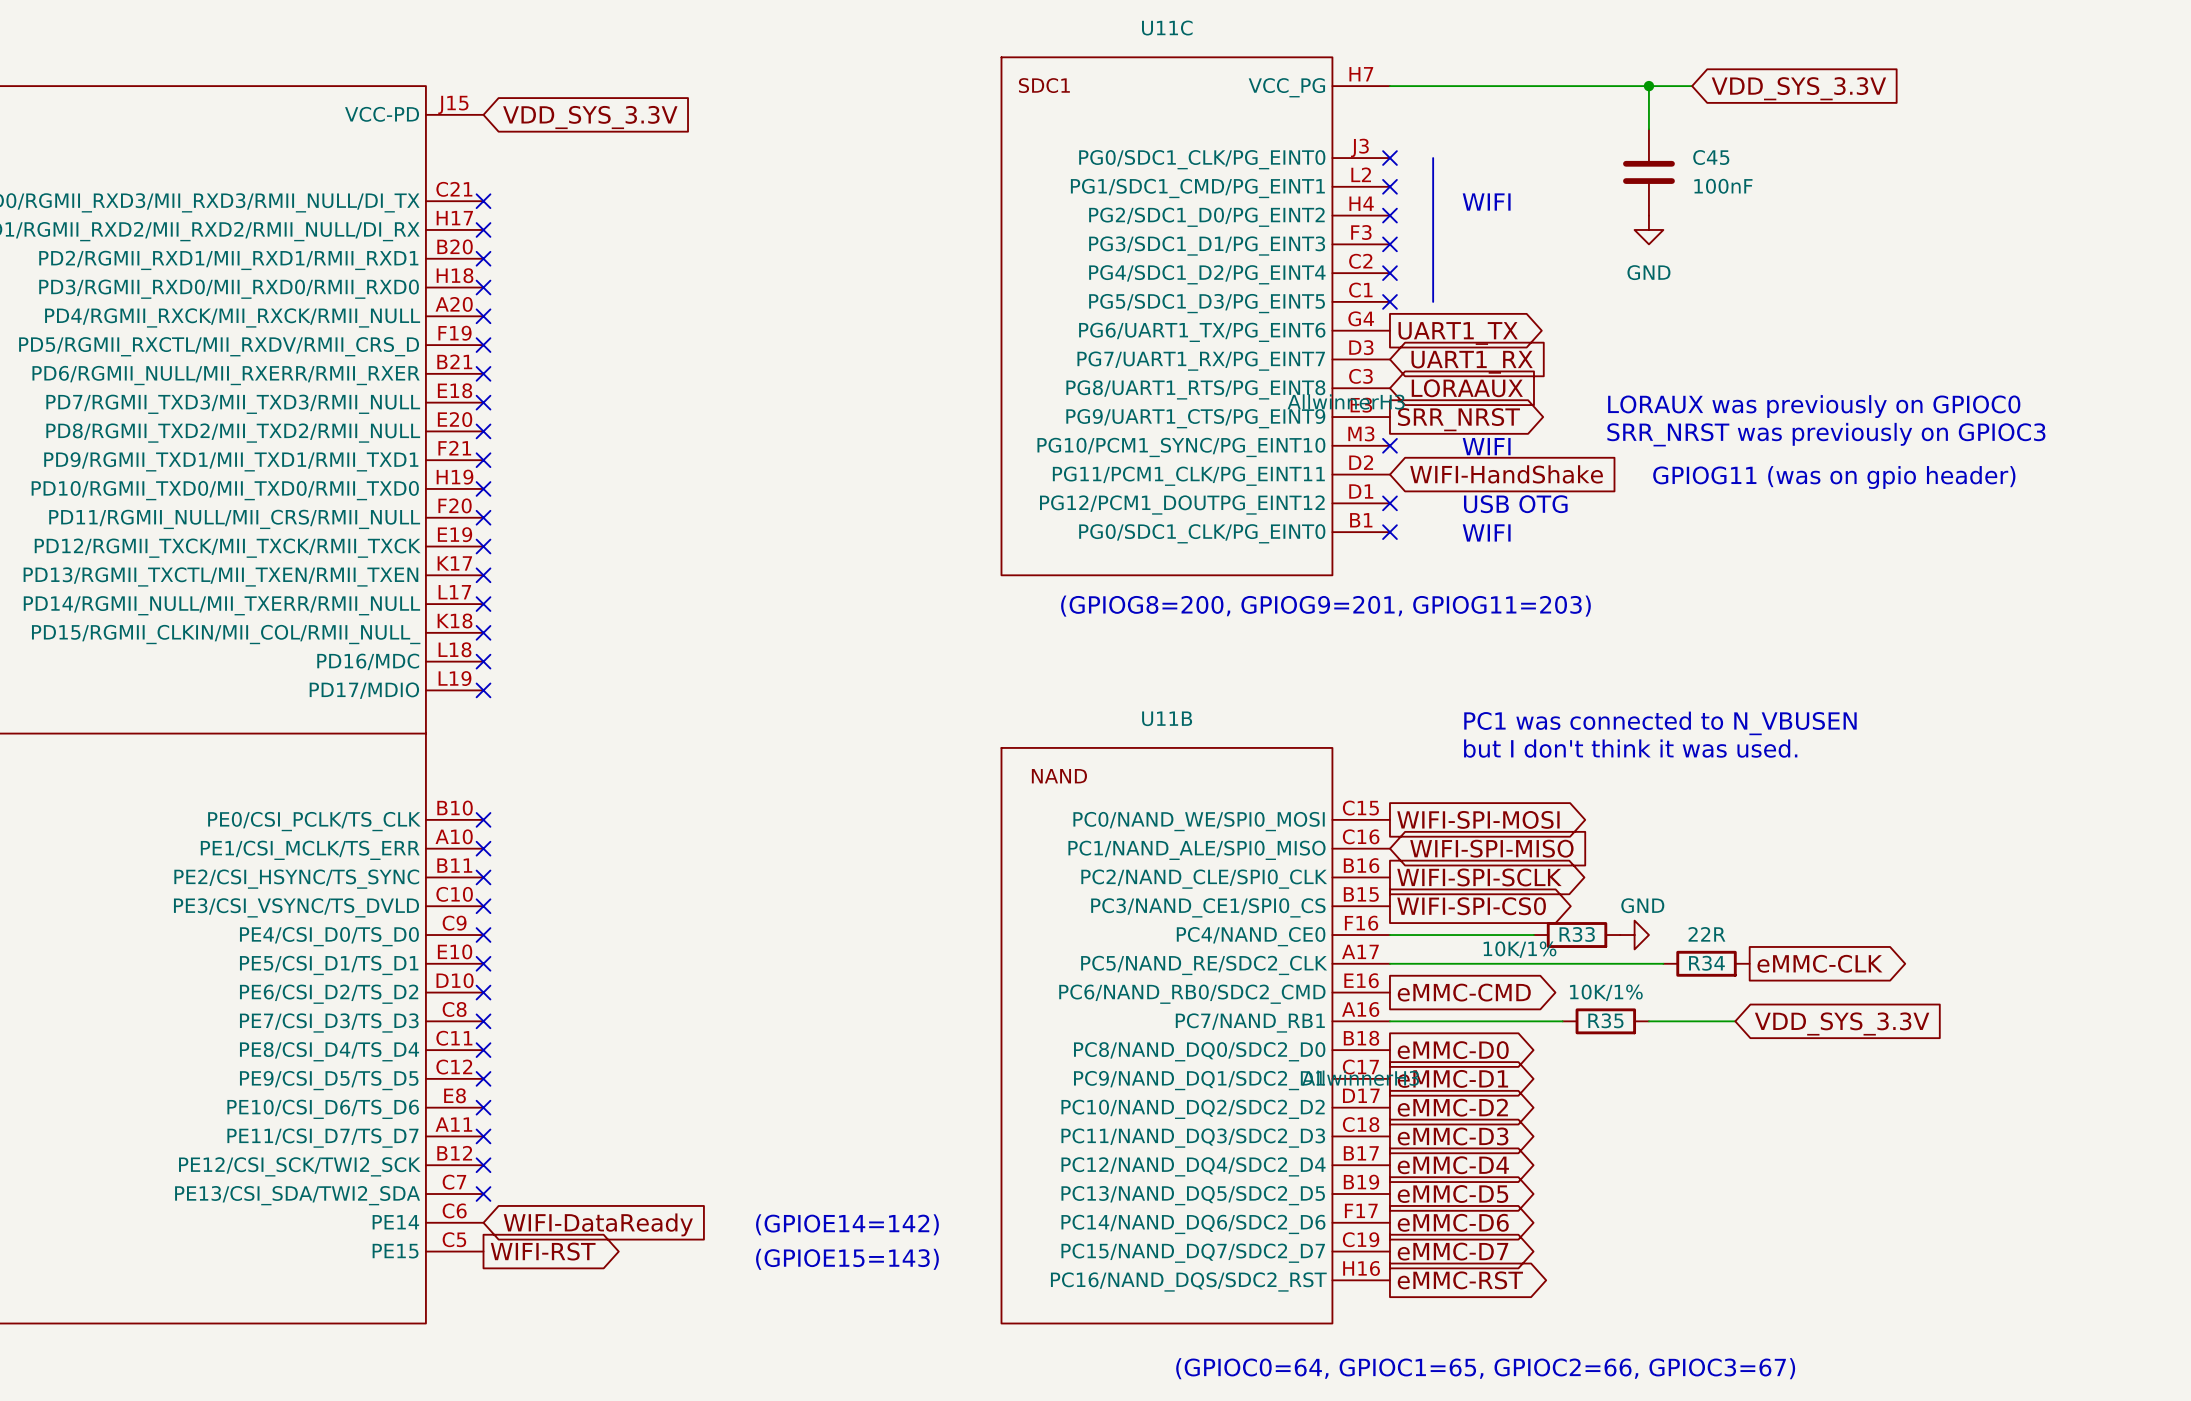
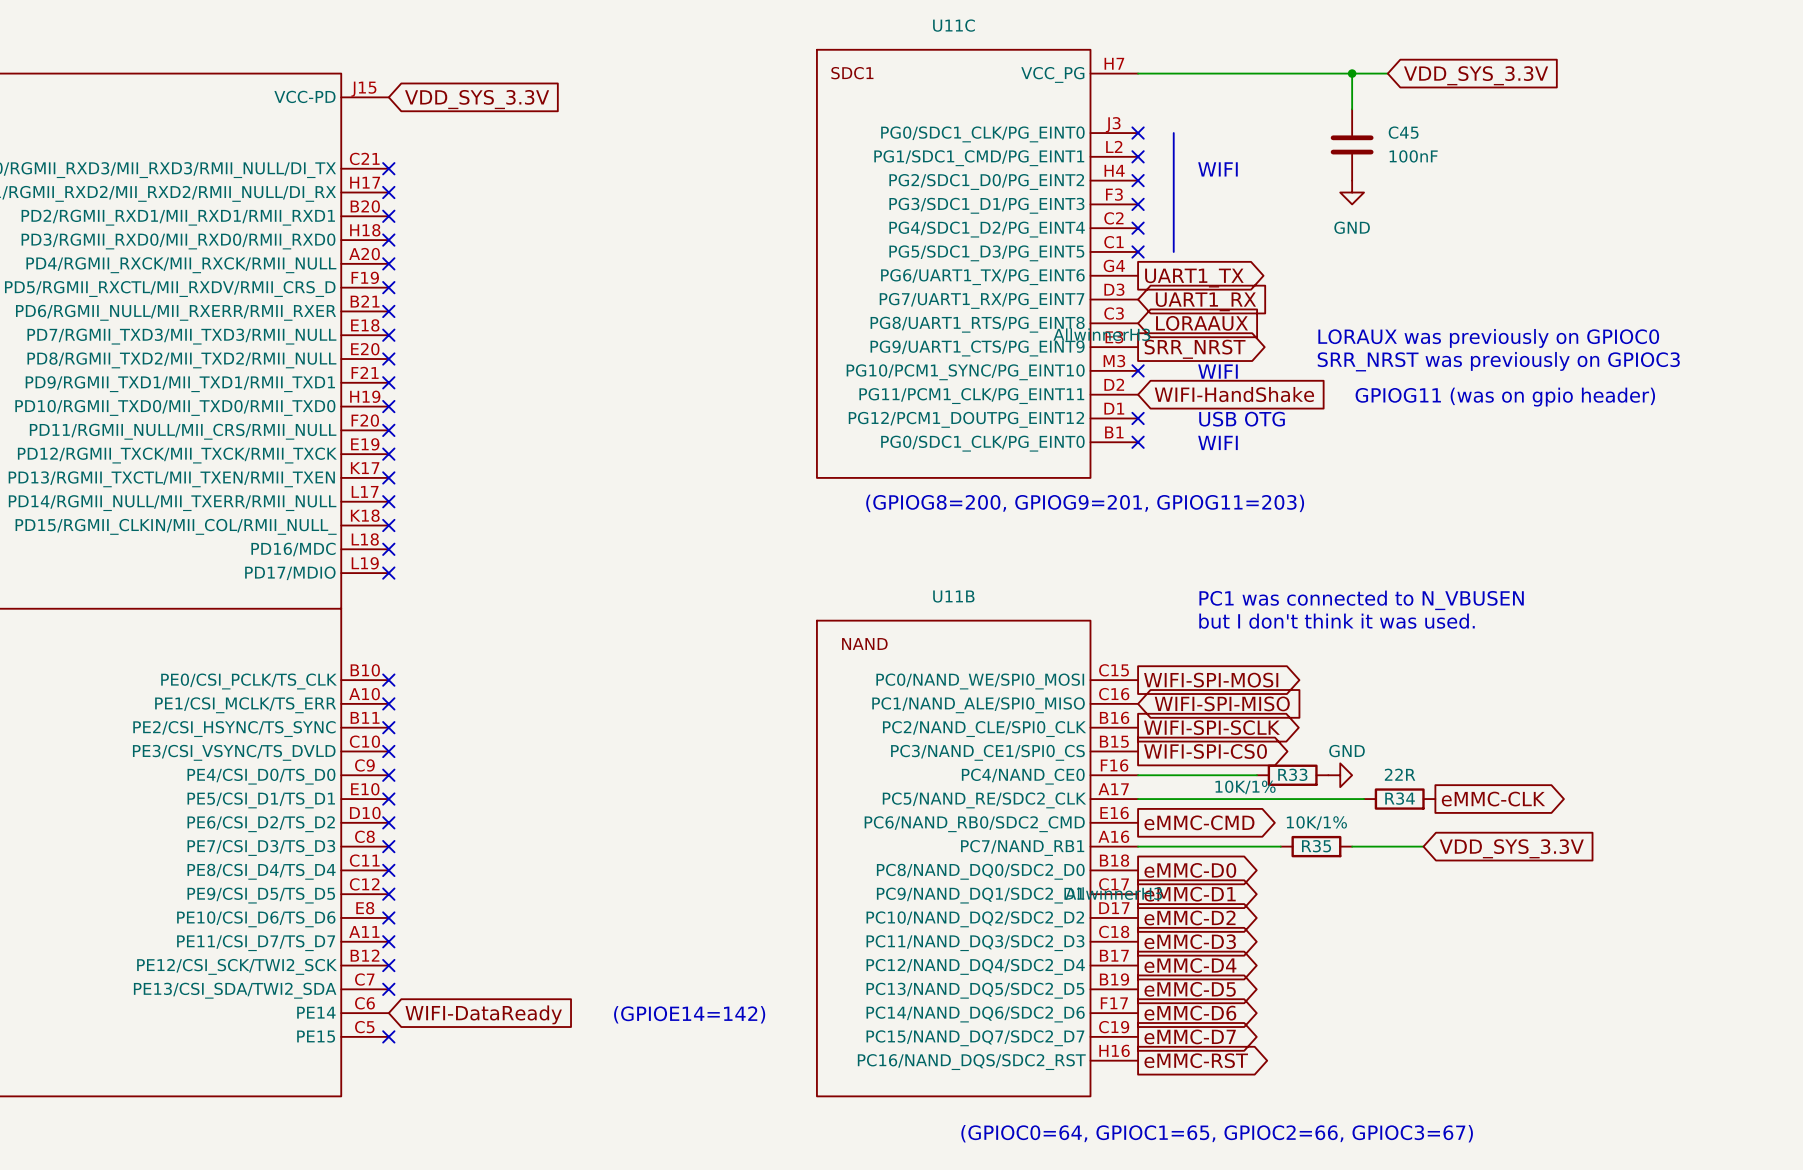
no-connect mark: none -> (388, 1036)
global label: WIFI-RST (543, 1251) -> none
text: (GPIOE15=143) (847, 1259) -> none

